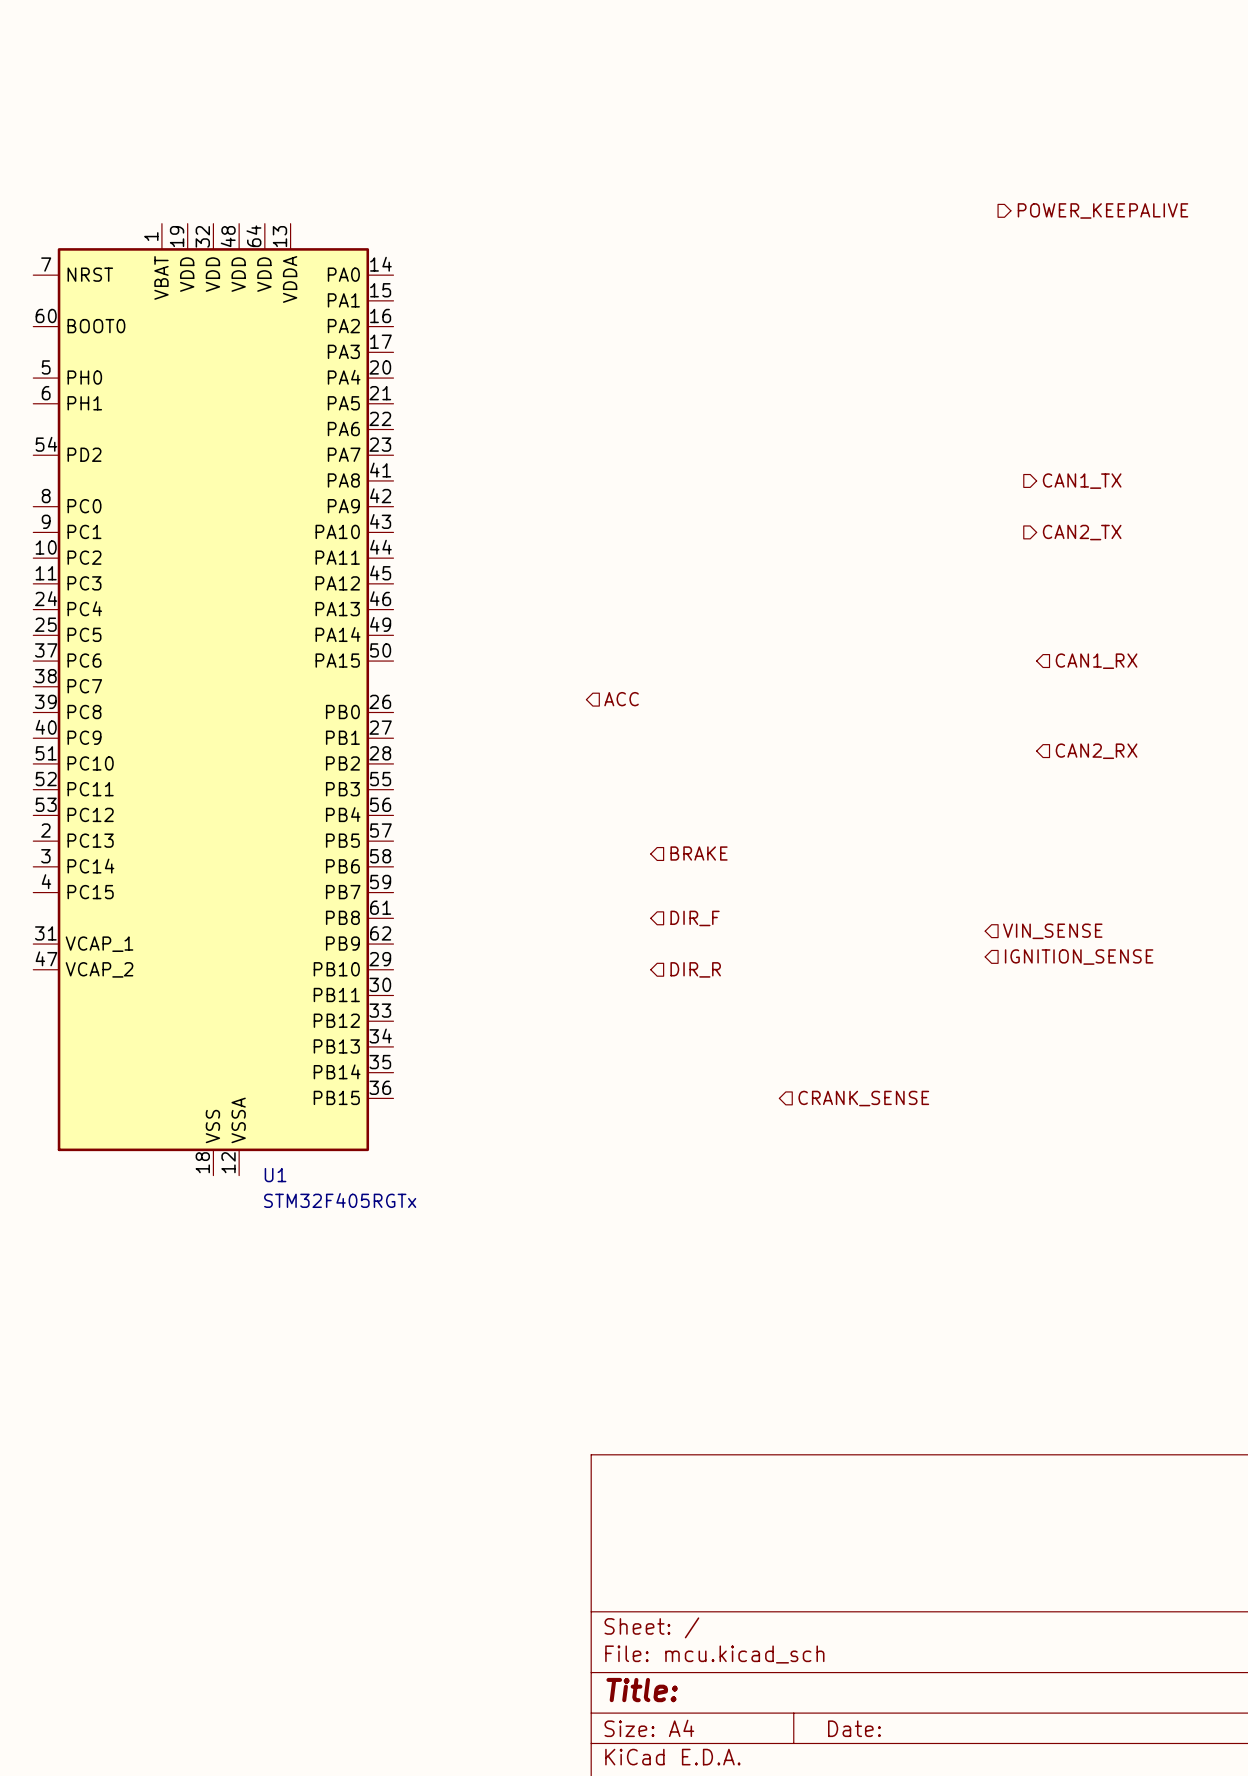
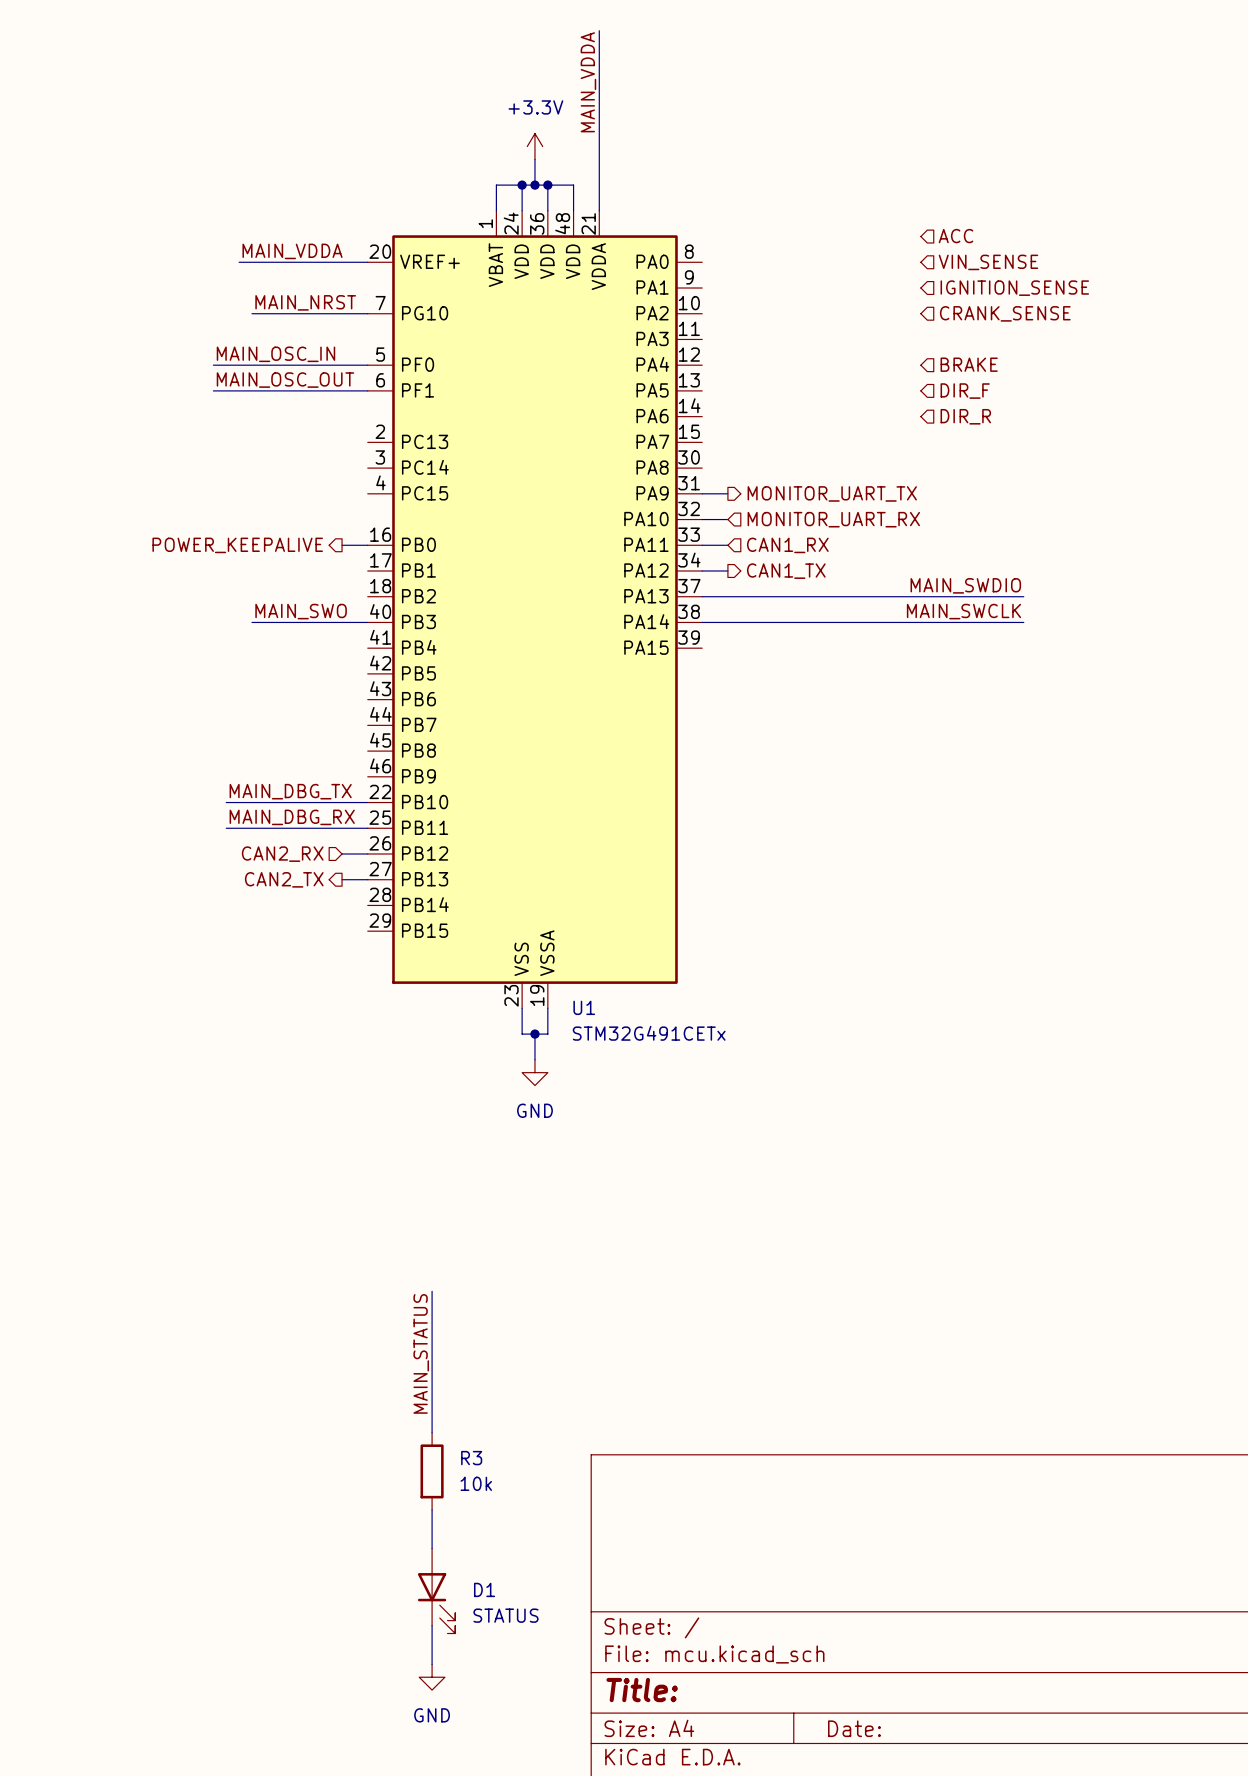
wire: none -> (599, 30) (599, 210)
label: none -> MAIN_VDDA (588, 82)
power symbol: none -> +3.3V (534, 146)
wire: none -> (534, 159) (534, 185)
wire: none -> (522, 185) (522, 210)
junction: none -> (522, 185)
junction: none -> (534, 185)
wire: none -> (547, 185) (547, 210)
junction: none -> (547, 185)
wire: none -> (496, 210) (496, 185) (573, 185) (573, 210)
hierarchical label: POWER_KEEPALIVE (1103, 210) -> none
U1 symbol: [33, 223, 394, 1176] -> [367, 210, 703, 1009]
hierarchical label: none -> ACC (955, 236)
label: none -> MAIN_VDDA (292, 251)
hierarchical label: none -> VIN_SENSE (988, 262)
hierarchical label: none -> IGNITION_SENSE (1014, 288)
label: none -> MAIN_NRST (305, 302)
hierarchical label: none -> CRANK_SENSE (1005, 313)
label: none -> MAIN_OSC_IN (275, 354)
hierarchical label: none -> BRAKE (969, 364)
label: none -> MAIN_OSC_OUT (285, 380)
hierarchical label: none -> DIR_F (965, 391)
hierarchical label: none -> DIR_R (965, 416)
hierarchical label: CAN1_TX (1082, 481) -> none
wire: none -> (702, 493) (727, 493)
hierarchical label: none -> MONITOR_UART_TX (832, 493)
wire: none -> (702, 519) (727, 519)
hierarchical label: none -> MONITOR_UART_RX (833, 519)
hierarchical label: CAN2_TX (1082, 532) -> none
hierarchical label: none -> POWER_KEEPALIVE (237, 545)
wire: none -> (702, 545) (727, 545)
hierarchical label: none -> CAN1_RX (787, 545)
wire: none -> (702, 571) (727, 571)
hierarchical label: none -> CAN1_TX (786, 571)
label: none -> MAIN_SWDIO (965, 585)
wire: none -> (702, 596) (1023, 596)
label: none -> MAIN_SWO (301, 611)
label: none -> MAIN_SWCLK (963, 611)
wire: none -> (702, 622) (1023, 622)
hierarchical label: CAN1_RX (1096, 661) -> none
hierarchical label: ACC (621, 699) -> none
hierarchical label: CAN2_RX (1096, 751) -> none
label: none -> MAIN_DBG_TX (290, 791)
label: none -> MAIN_DBG_RX (292, 817)
hierarchical label: BRAKE (699, 853) -> none
hierarchical label: none -> CAN2_RX (282, 854)
hierarchical label: none -> CAN2_TX (284, 879)
hierarchical label: DIR_F (695, 918) -> none
hierarchical label: VIN_SENSE (1052, 931) -> none
hierarchical label: IGNITION_SENSE (1079, 957) -> none
hierarchical label: DIR_R (695, 969) -> none
wire: none -> (522, 1008) (522, 1034) (547, 1034) (547, 1008)
wire: none -> (534, 1034) (534, 1059)
junction: none -> (534, 1034)
power symbol: none -> GND (534, 1072)
hierarchical label: CRANK_SENSE (863, 1098) -> none
U1 name position: U1 (275, 1175) -> U1 (584, 1007)
U1 value: STM32F405RGTx (340, 1200) -> STM32G491CETx (649, 1033)
wire: none -> (432, 1291) (432, 1432)
label: none -> MAIN_STATUS (421, 1353)
R3: none -> 10k (432, 1471)
wire: none -> (432, 1510) (432, 1548)
D1: none -> STATUS (436, 1591)
wire: none -> (432, 1625) (432, 1664)
power symbol: none -> GND (432, 1677)

